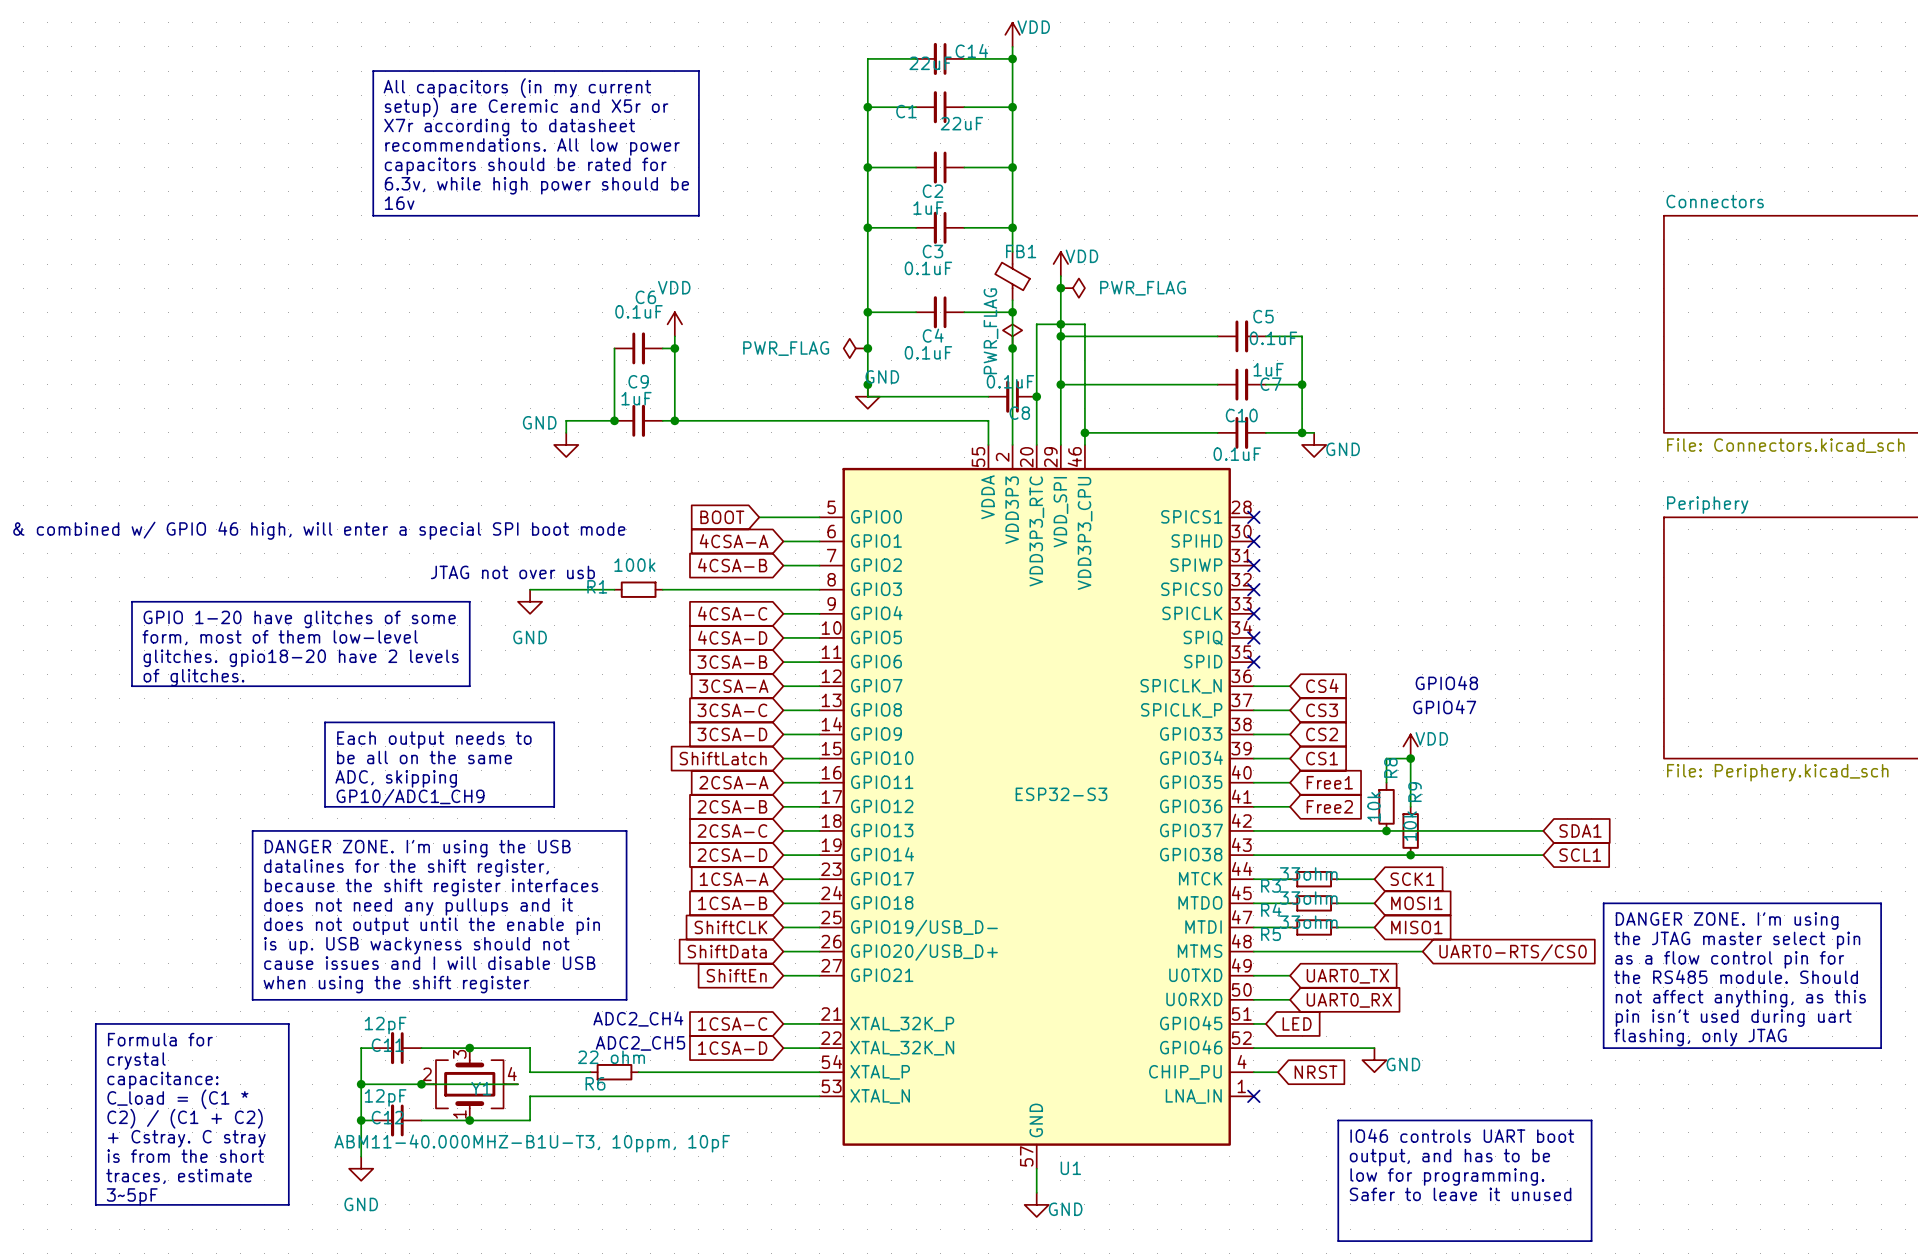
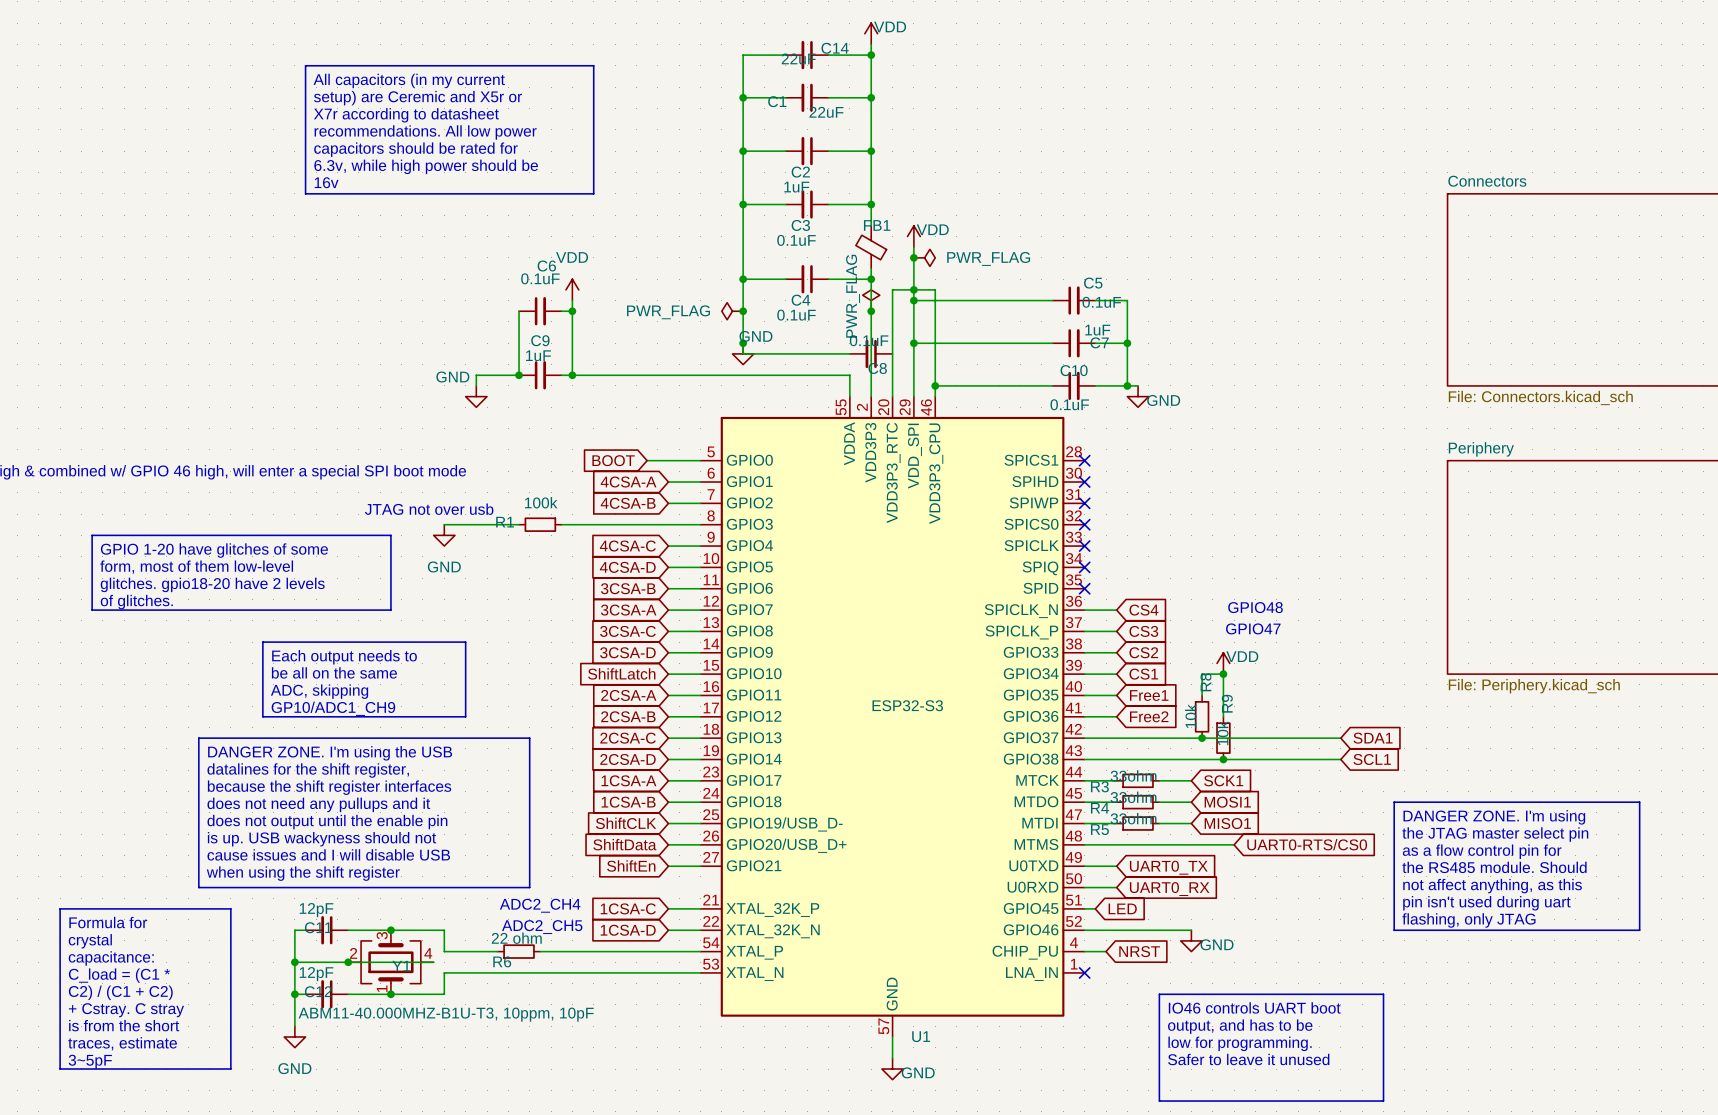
junction: (1036, 396) -> none

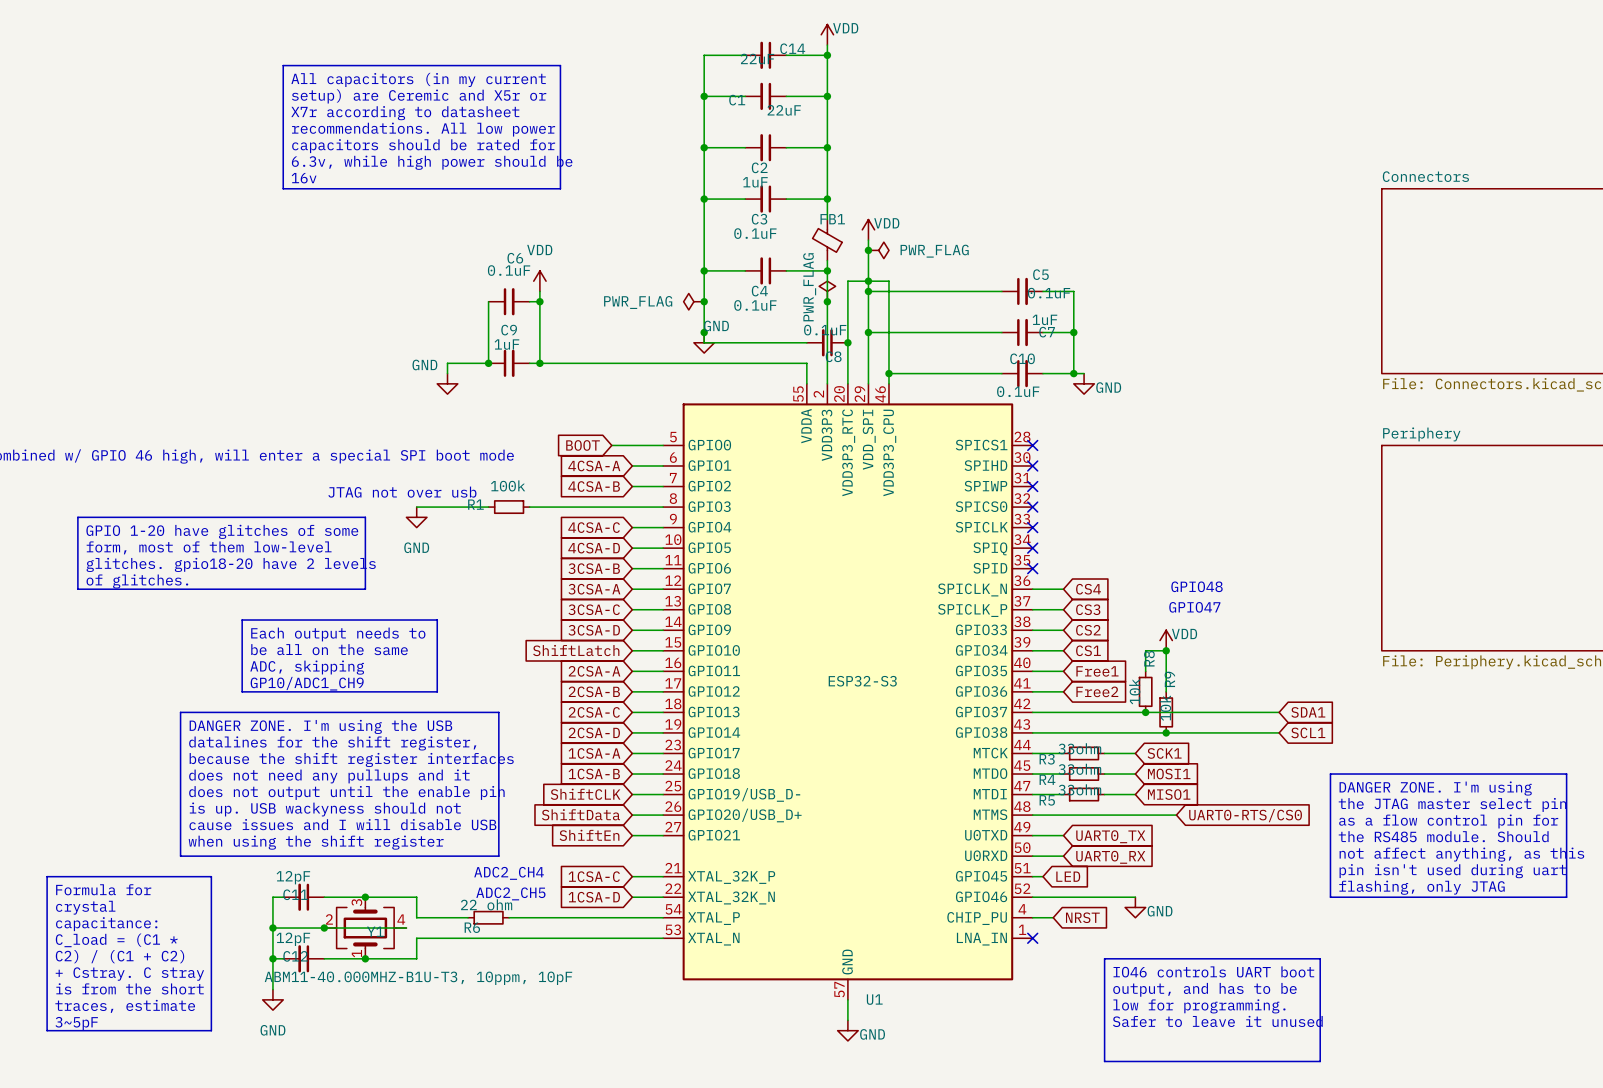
junction: none -> (847, 342)

